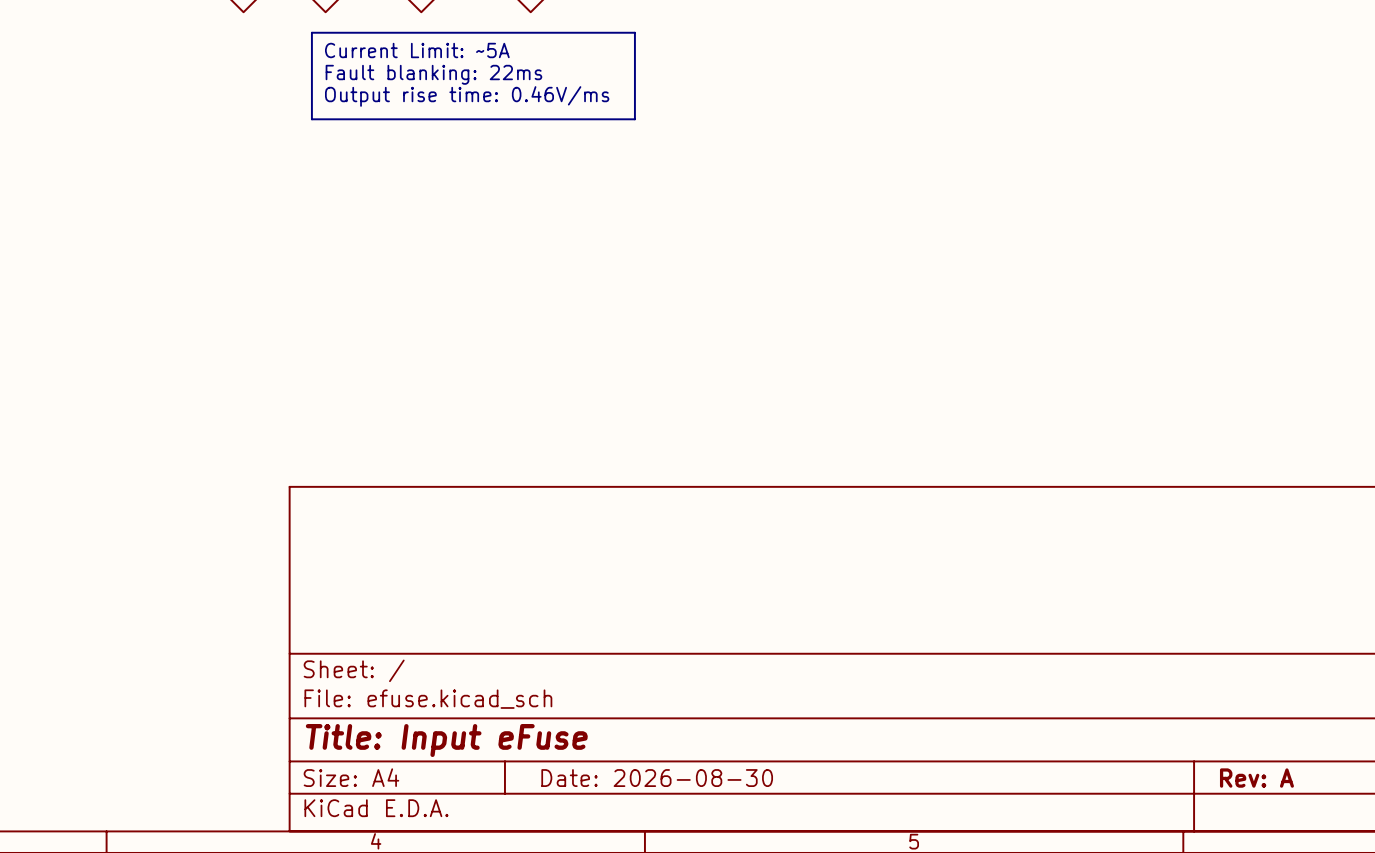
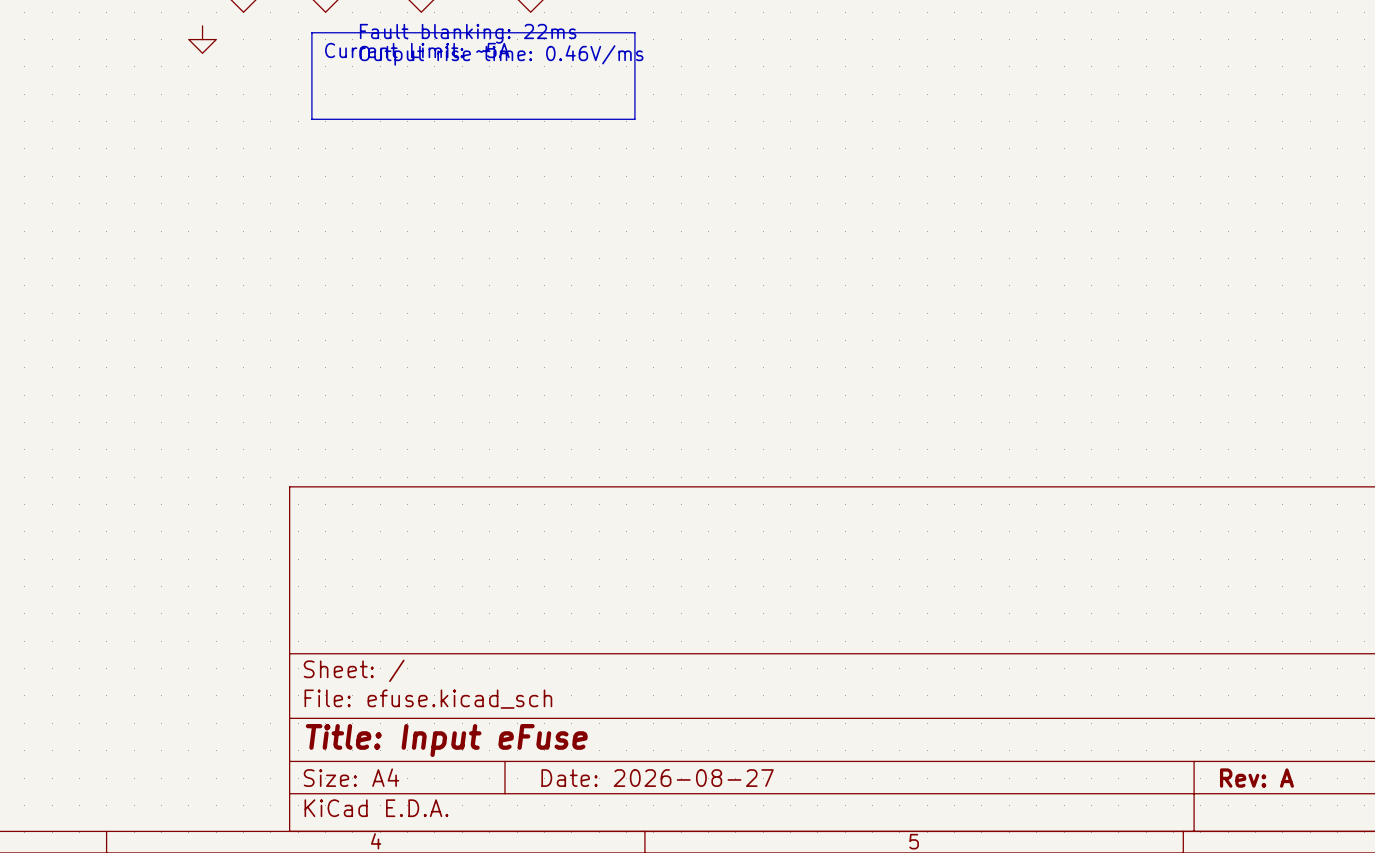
power symbol: none -> (202, 39)
text position: Fault blanking: 22ms (433, 74) -> Fault blanking: 22ms (468, 33)
text position: Output rise time: 0.46V/ms (467, 96) -> Output rise time: 0.46V/ms (501, 55)
title block: Date: 2026-08-30 (657, 778) -> Date: 2026-08-27 (657, 778)

